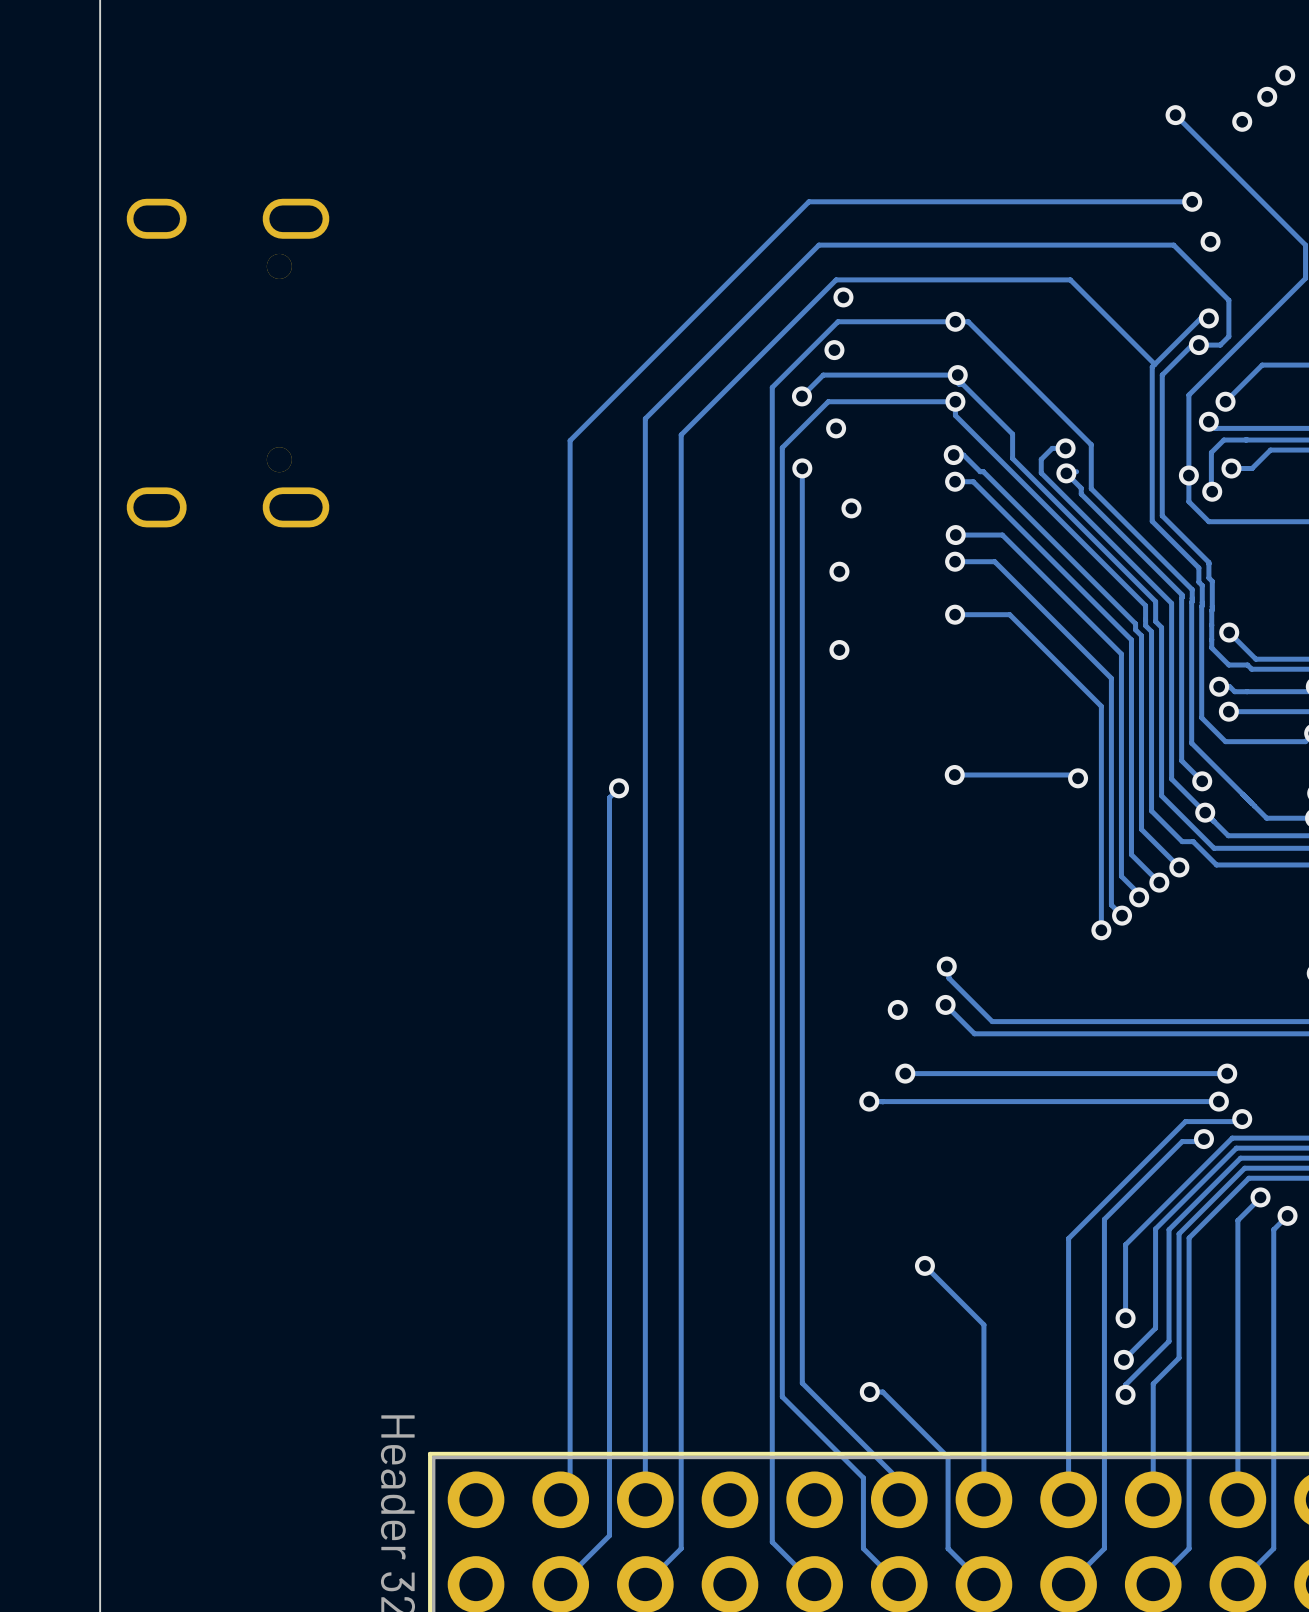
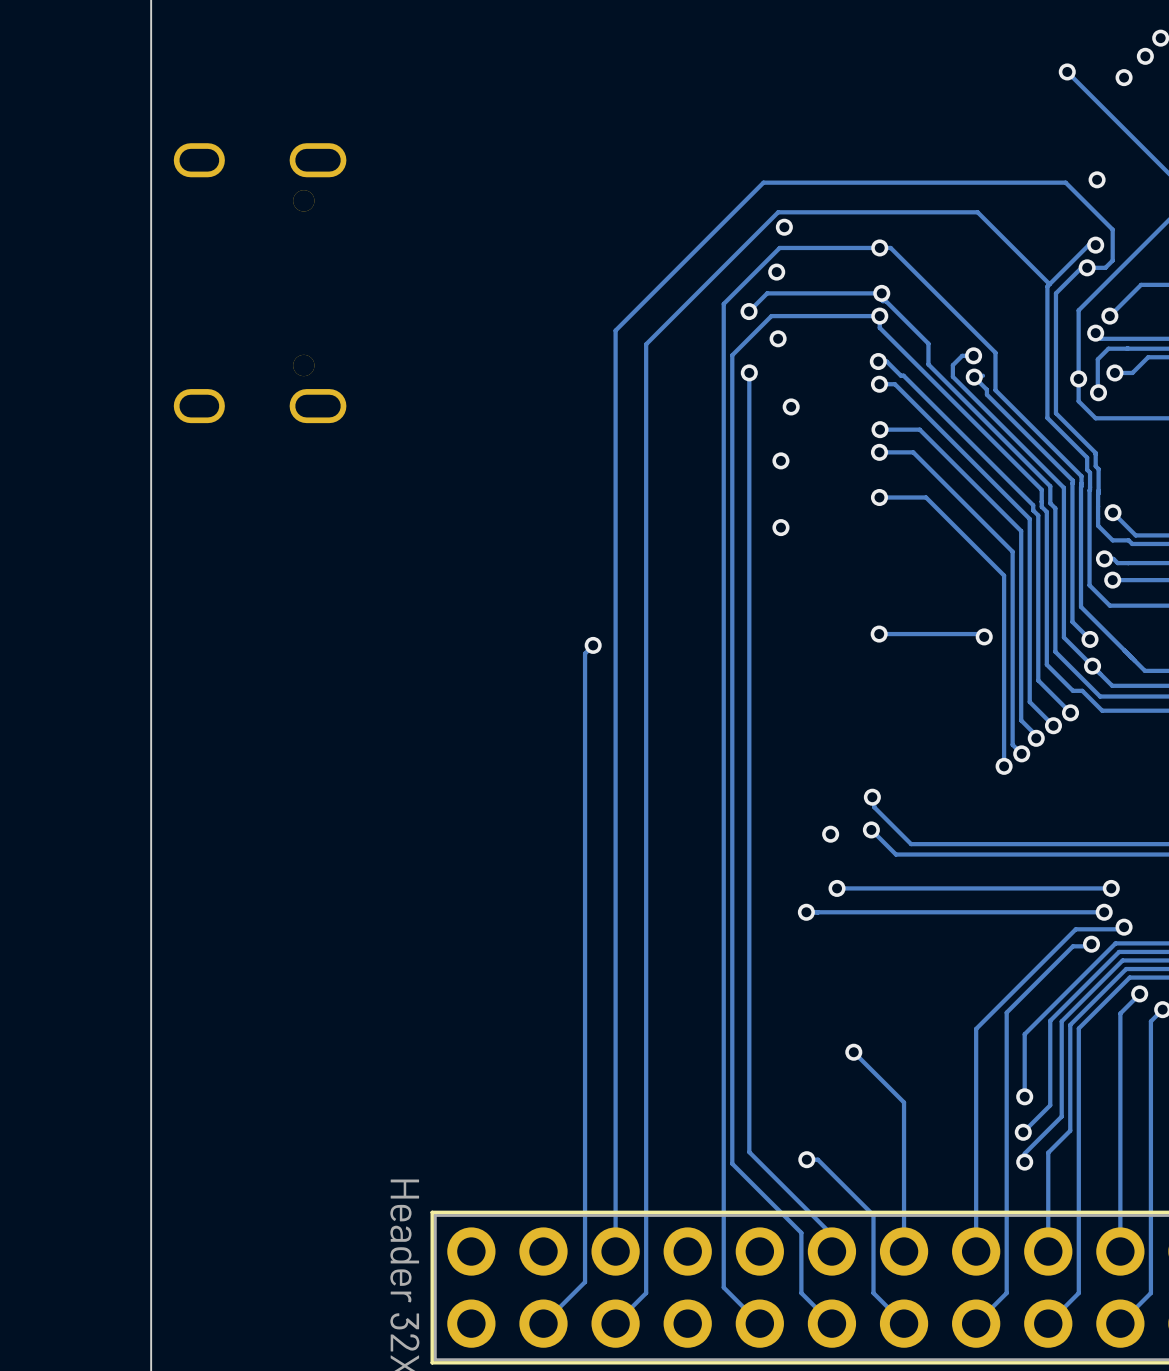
track: (1192, 201) (808, 201) (570, 440) (570, 1490) (560, 1499) -> none
via: (1192, 201) -> none

